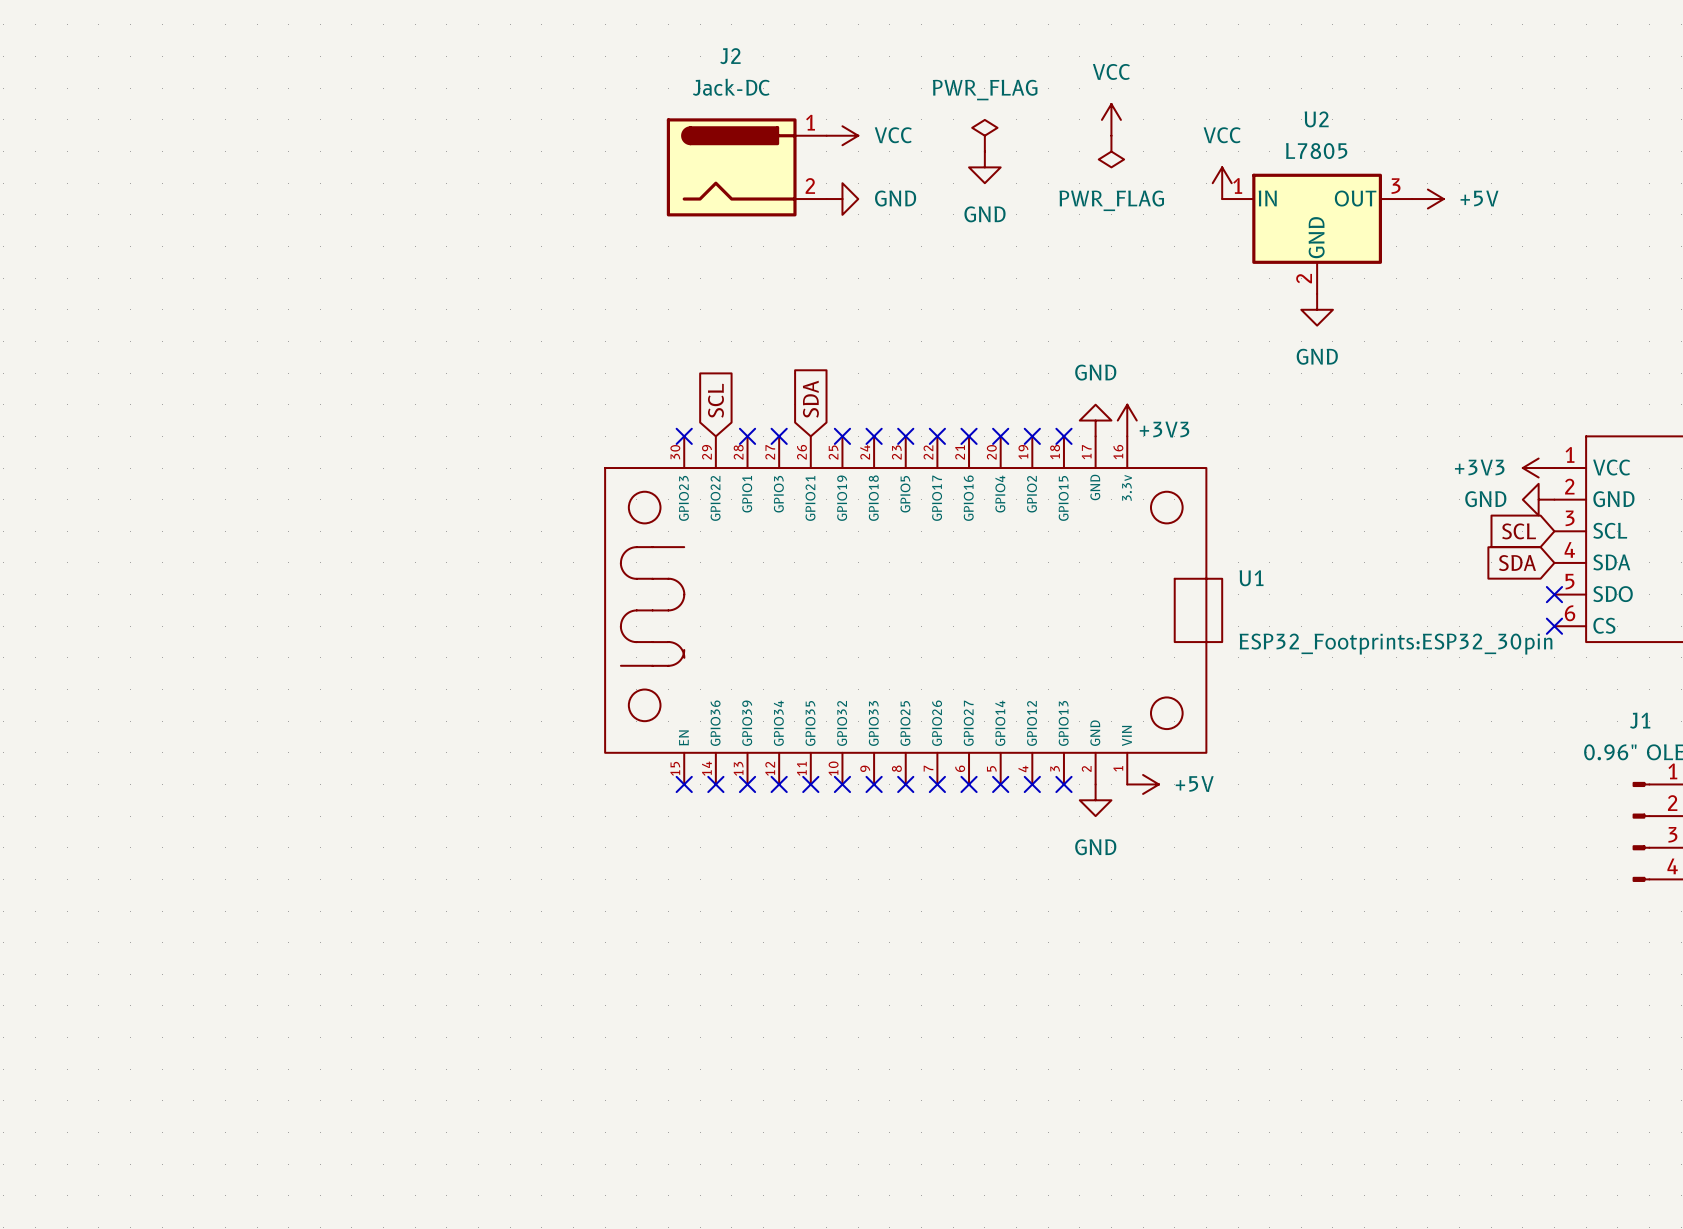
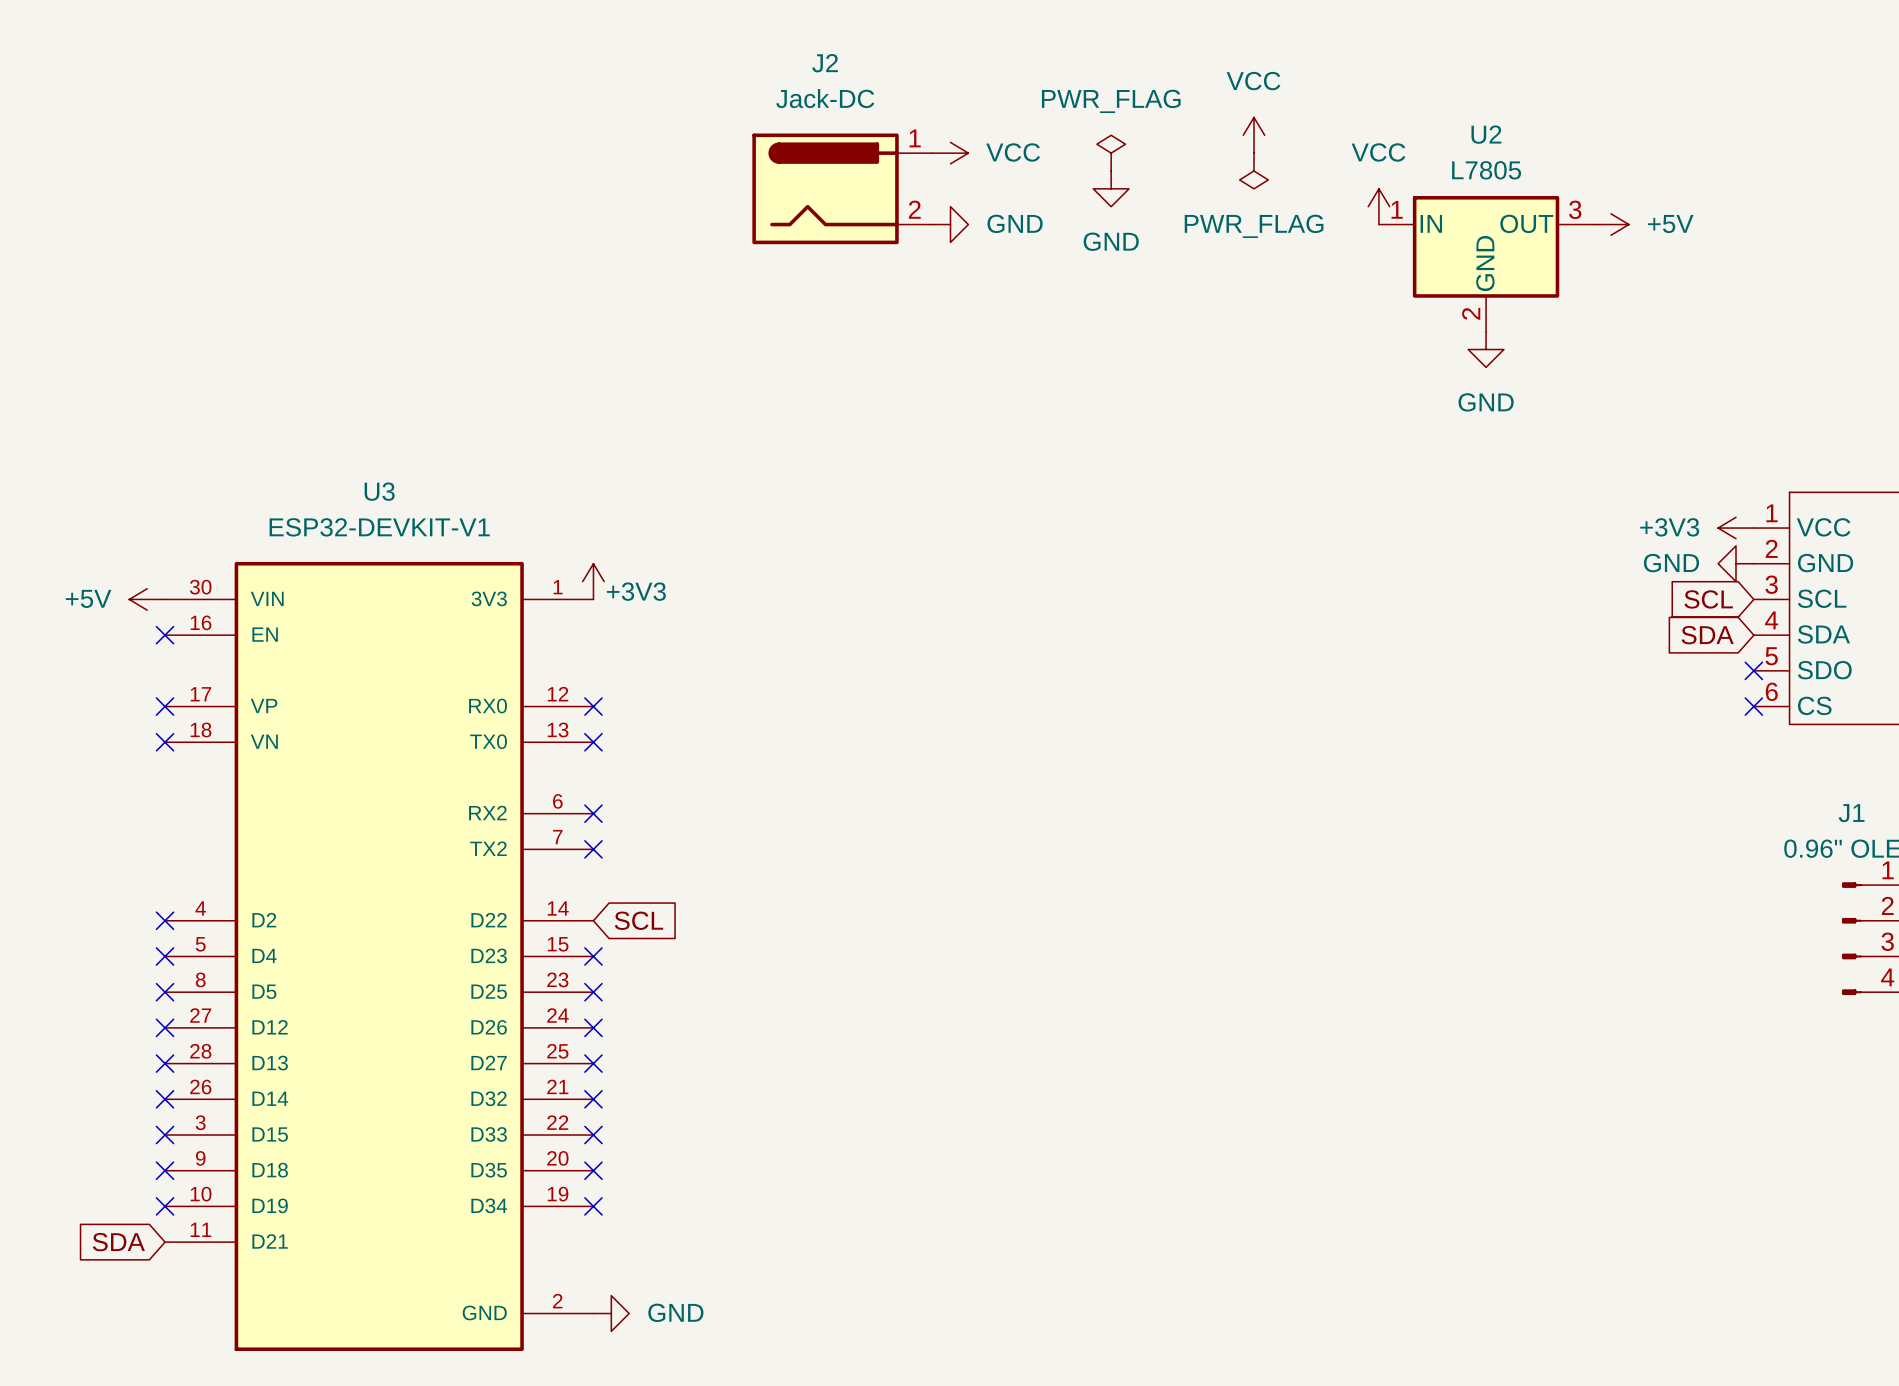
global label: SDA (810, 399) -> none
global label: SCL (715, 400) -> none
power symbol: GND (1095, 420) -> none
power symbol: +3V3 (1127, 420) -> none
no-connect mark: (684, 436) -> none
no-connect mark: (747, 436) -> none
no-connect mark: (779, 436) -> none
no-connect mark: (842, 436) -> none
no-connect mark: (874, 436) -> none
no-connect mark: (905, 436) -> none
no-connect mark: (937, 436) -> none
no-connect mark: (969, 436) -> none
no-connect mark: (1000, 436) -> none
no-connect mark: (1032, 436) -> none
no-connect mark: (1063, 436) -> none
power symbol: none -> +3V3 (593, 581)
power symbol: none -> +5V (147, 599)
no-connect mark: none -> (165, 635)
U1: (913, 610) -> none
no-connect mark: none -> (165, 706)
no-connect mark: none -> (593, 706)
no-connect mark: none -> (165, 742)
no-connect mark: none -> (593, 742)
no-connect mark: none -> (593, 813)
no-connect mark: none -> (593, 849)
no-connect mark: (684, 784) -> none
no-connect mark: (715, 784) -> none
no-connect mark: (747, 784) -> none
no-connect mark: (779, 784) -> none
no-connect mark: (810, 784) -> none
no-connect mark: (842, 784) -> none
no-connect mark: (874, 784) -> none
no-connect mark: (905, 784) -> none
no-connect mark: (937, 784) -> none
no-connect mark: (969, 784) -> none
no-connect mark: (1000, 784) -> none
no-connect mark: (1032, 784) -> none
no-connect mark: (1063, 784) -> none
power symbol: +5V (1143, 784) -> none
power symbol: GND (1095, 800) -> none
no-connect mark: none -> (165, 920)
global label: none -> SCL (638, 920)
no-connect mark: none -> (165, 956)
U3: none -> ESP32-DEVKIT-V1 (379, 956)
no-connect mark: none -> (593, 956)
no-connect mark: none -> (165, 992)
no-connect mark: none -> (593, 992)
no-connect mark: none -> (165, 1027)
no-connect mark: none -> (593, 1027)
no-connect mark: none -> (165, 1063)
no-connect mark: none -> (593, 1063)
no-connect mark: none -> (165, 1099)
no-connect mark: none -> (593, 1099)
no-connect mark: none -> (165, 1135)
no-connect mark: none -> (593, 1135)
no-connect mark: none -> (165, 1170)
no-connect mark: none -> (593, 1170)
no-connect mark: none -> (165, 1206)
no-connect mark: none -> (593, 1206)
global label: none -> SDA (118, 1242)
power symbol: none -> GND (611, 1313)

